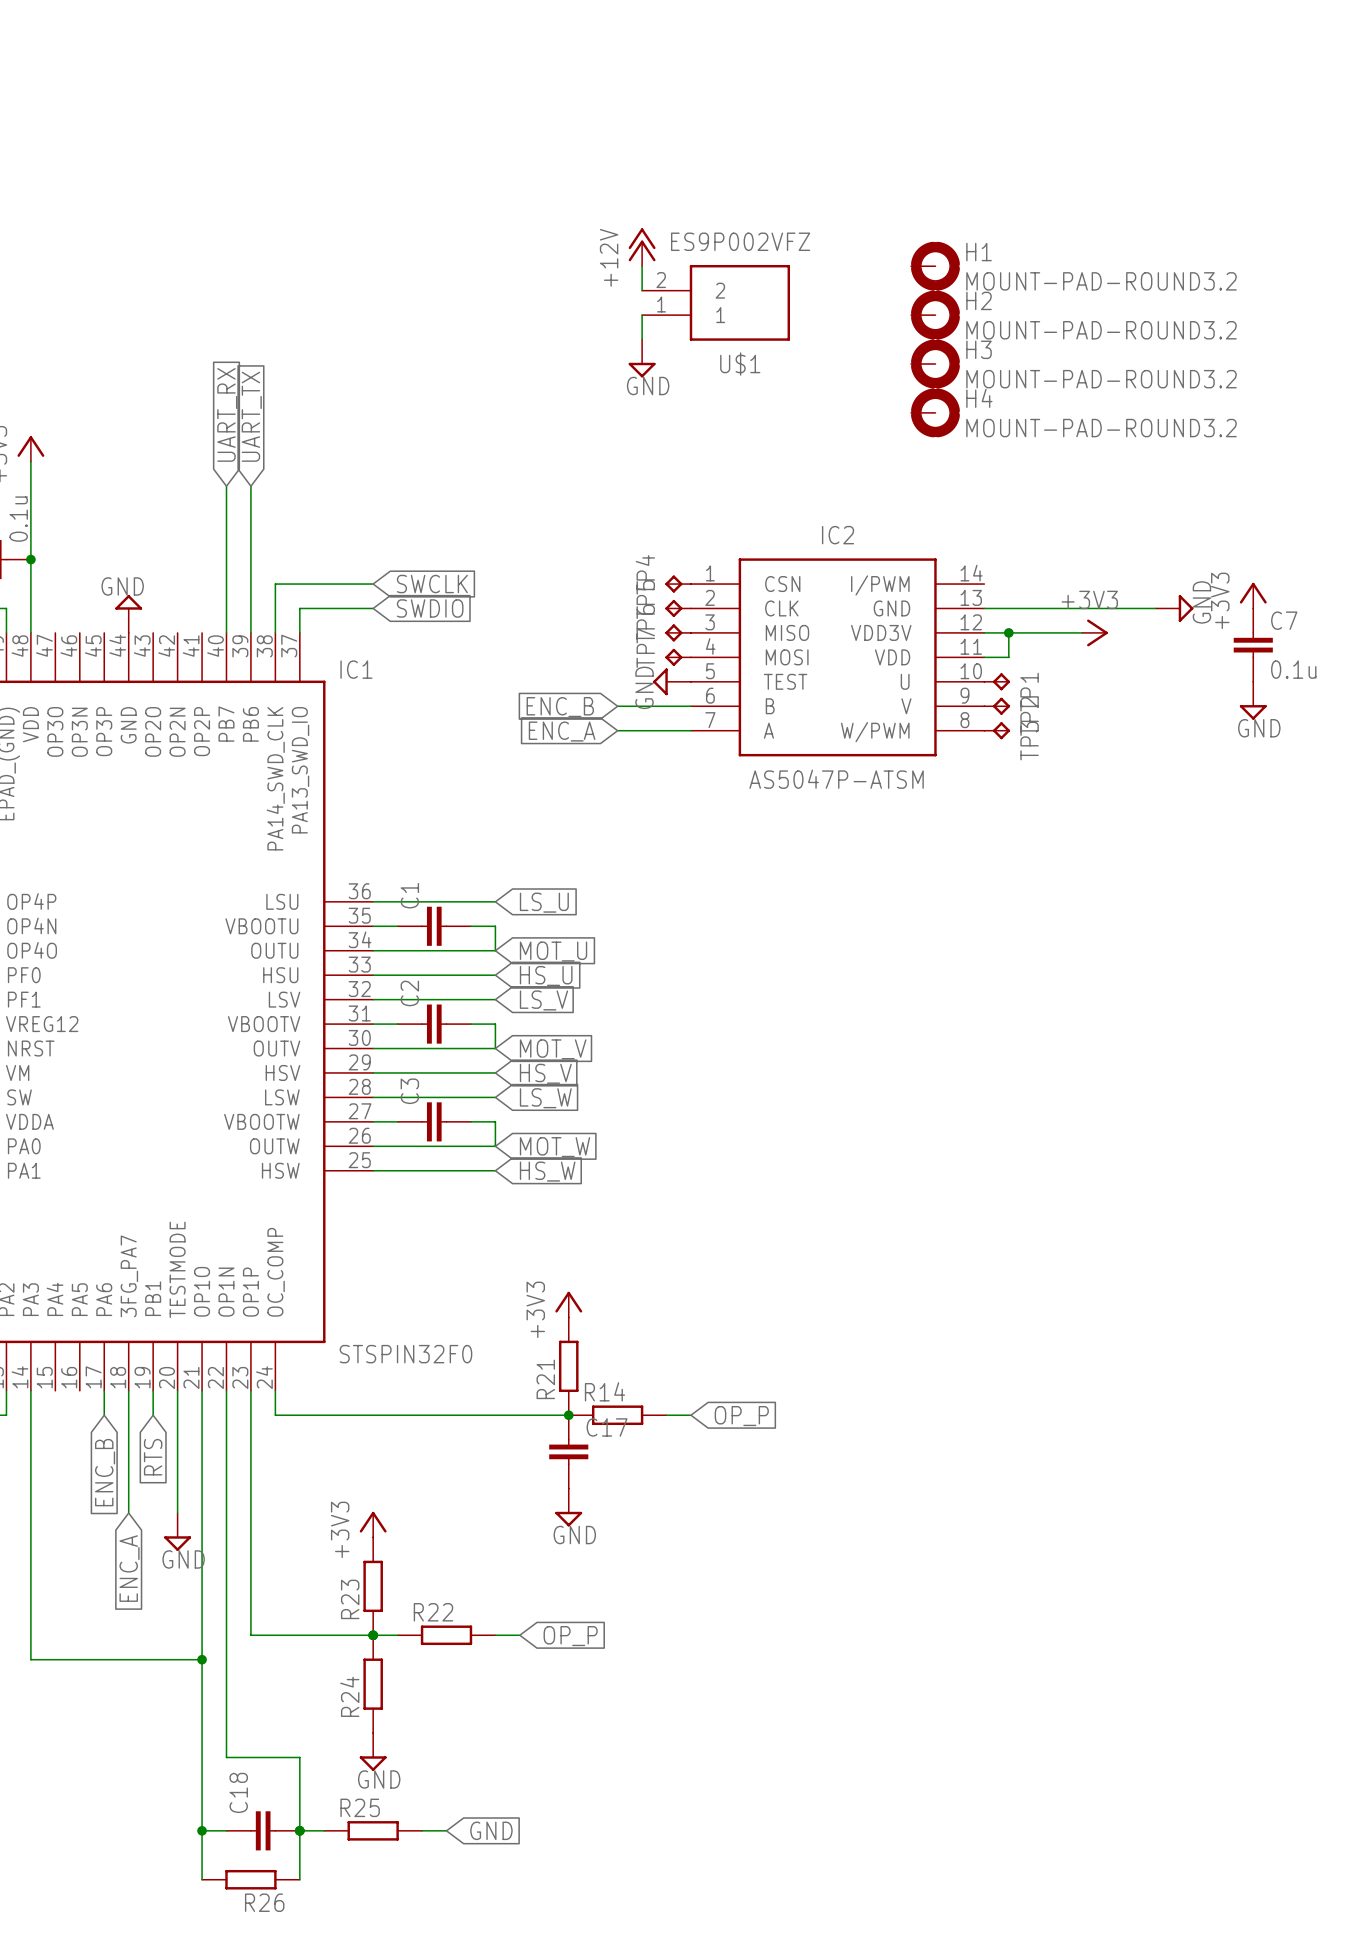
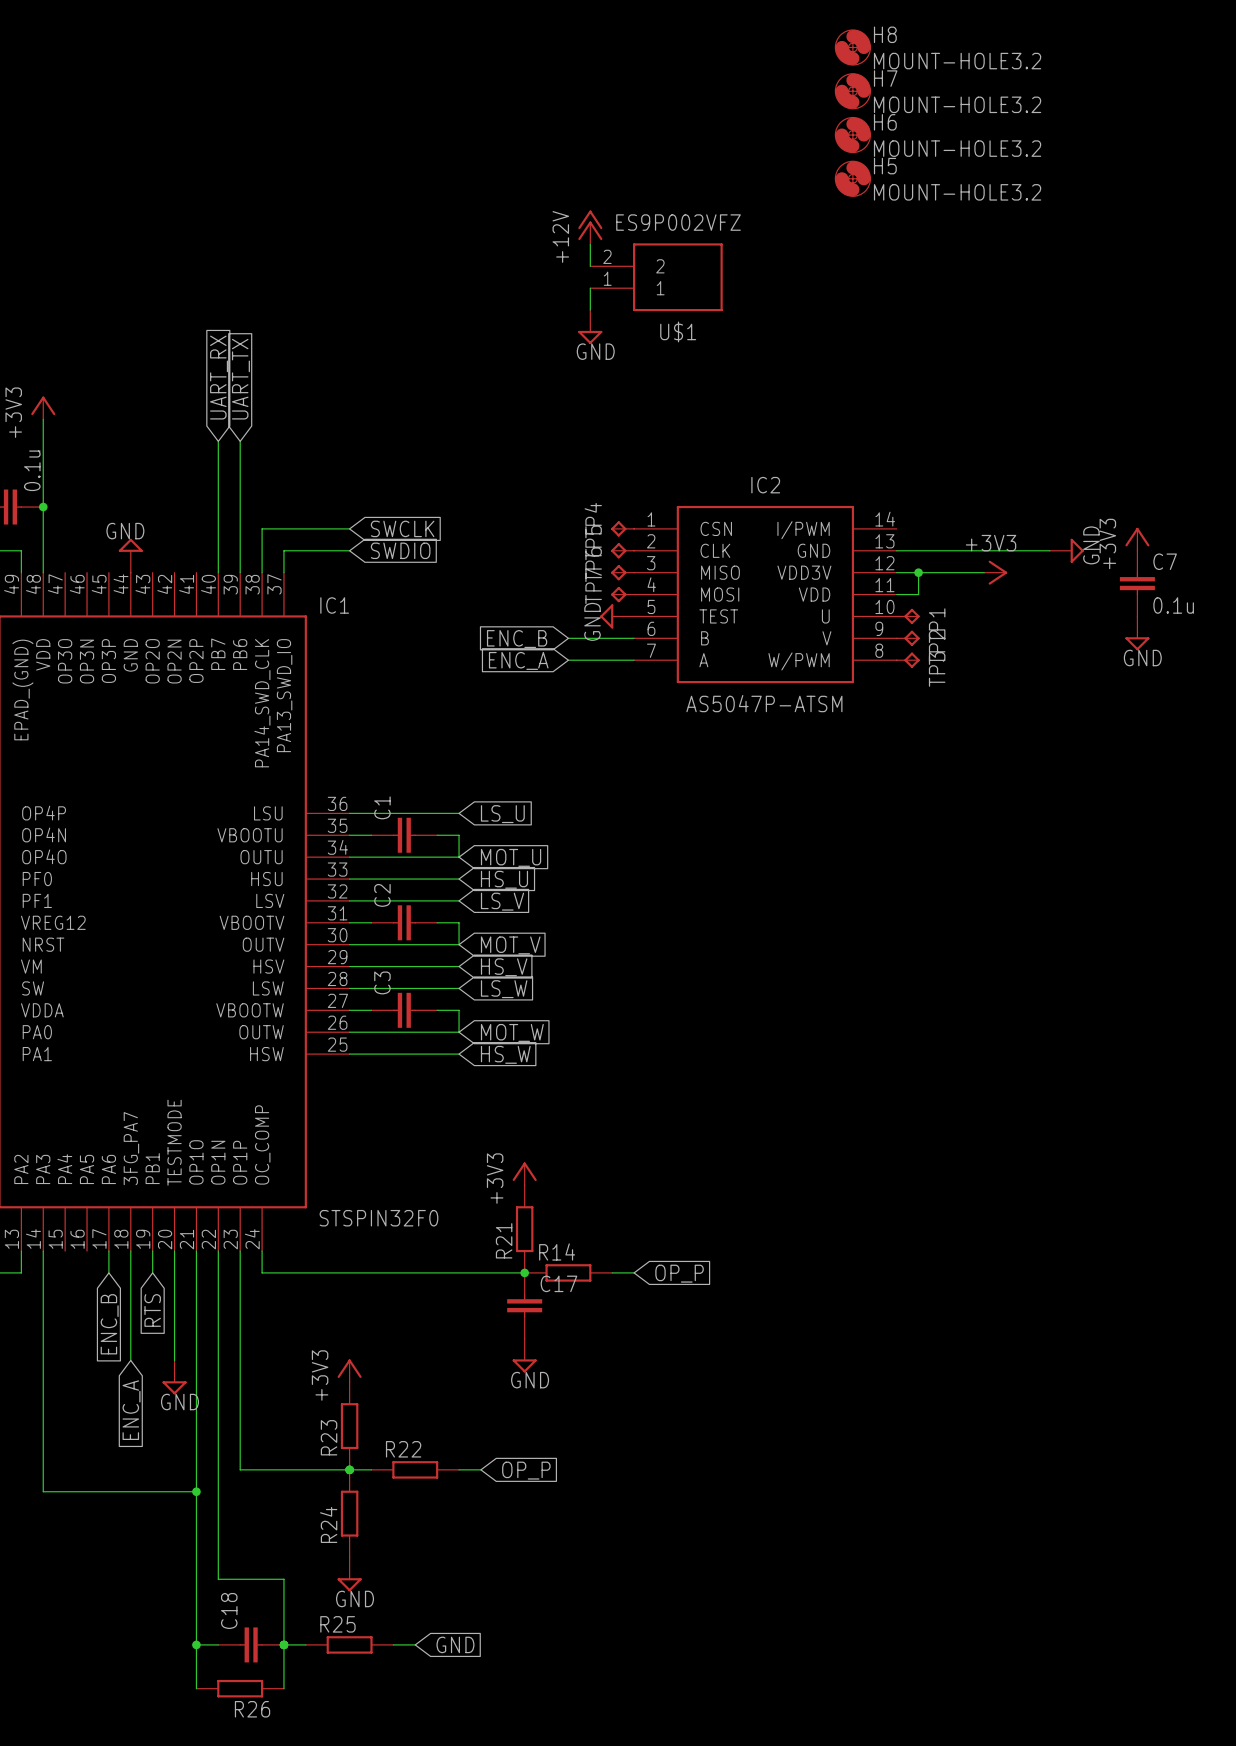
H8: none -> MOUNT-HOLE3.2 (852, 47)
H7: none -> MOUNT-HOLE3.2 (852, 91)
H6: none -> MOUNT-HOLE3.2 (852, 135)
H5: none -> MOUNT-HOLE3.2 (852, 178)
H1: MOUNT-PAD-ROUND3.2 (935, 266) -> none
H2: MOUNT-PAD-ROUND3.2 (935, 315) -> none
H3: MOUNT-PAD-ROUND3.2 (935, 364) -> none
H4: MOUNT-PAD-ROUND3.2 (935, 412) -> none

